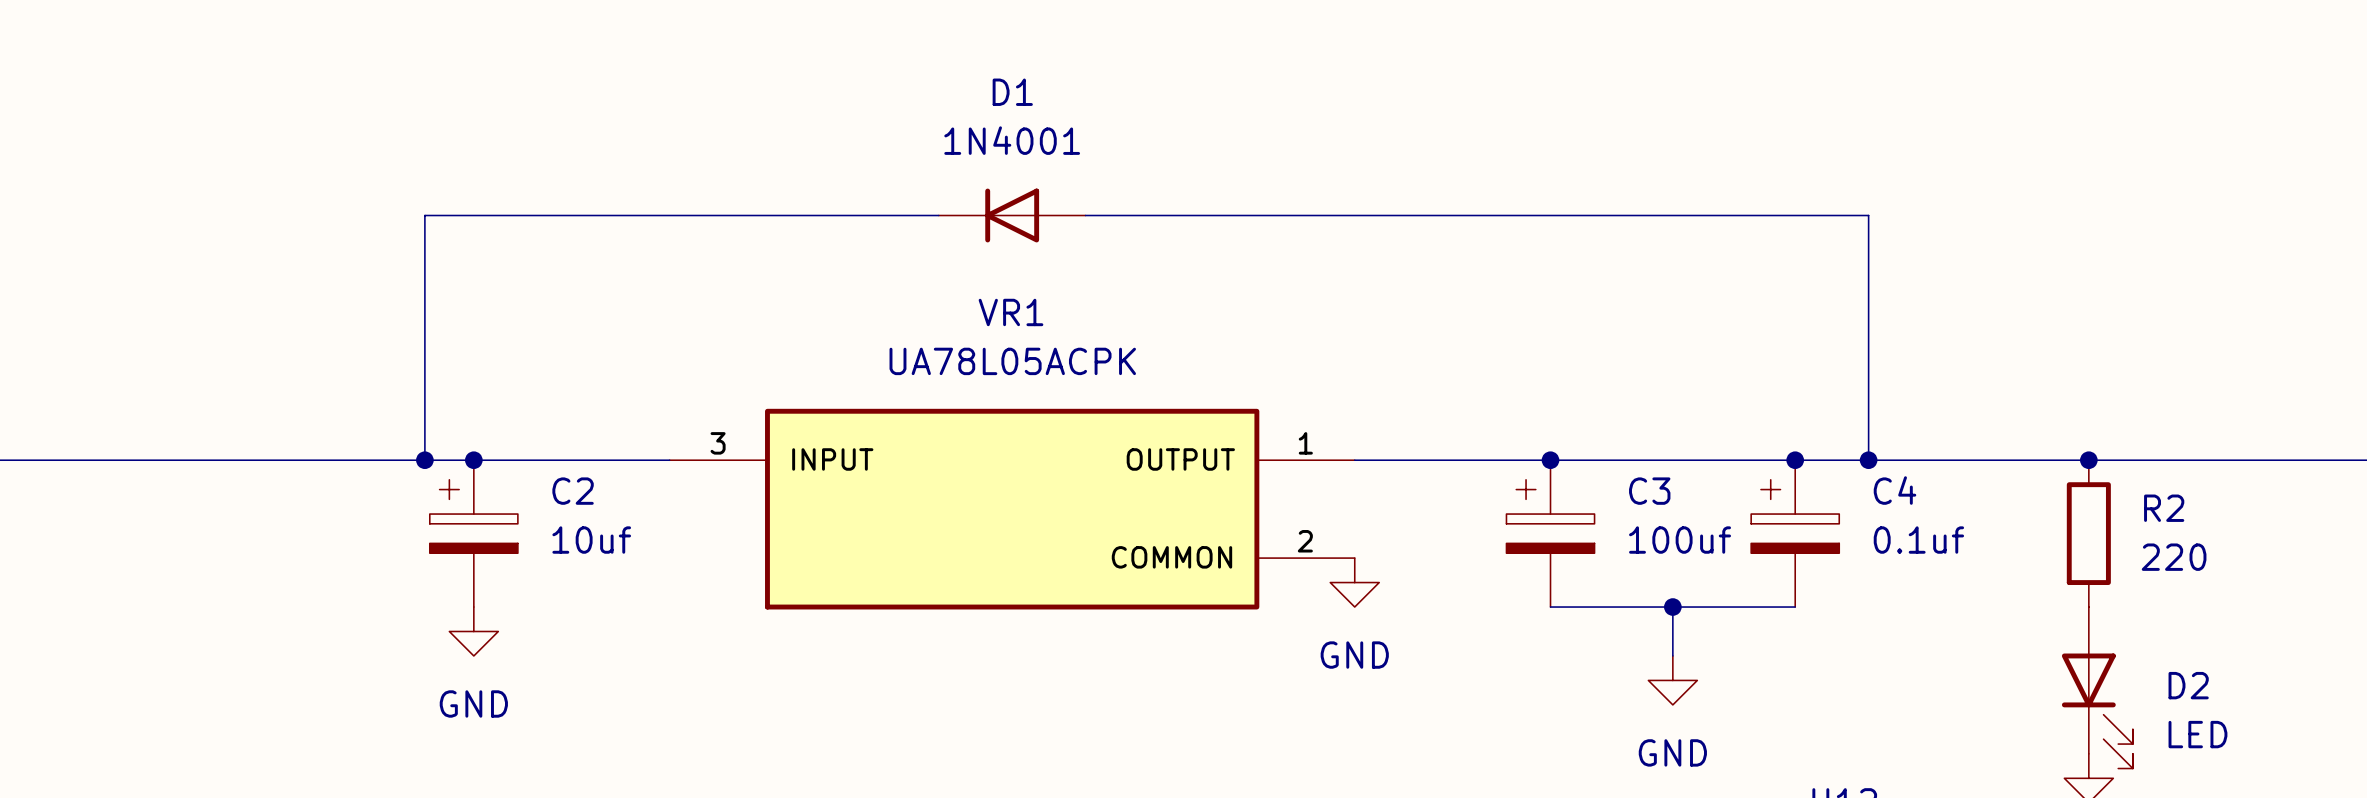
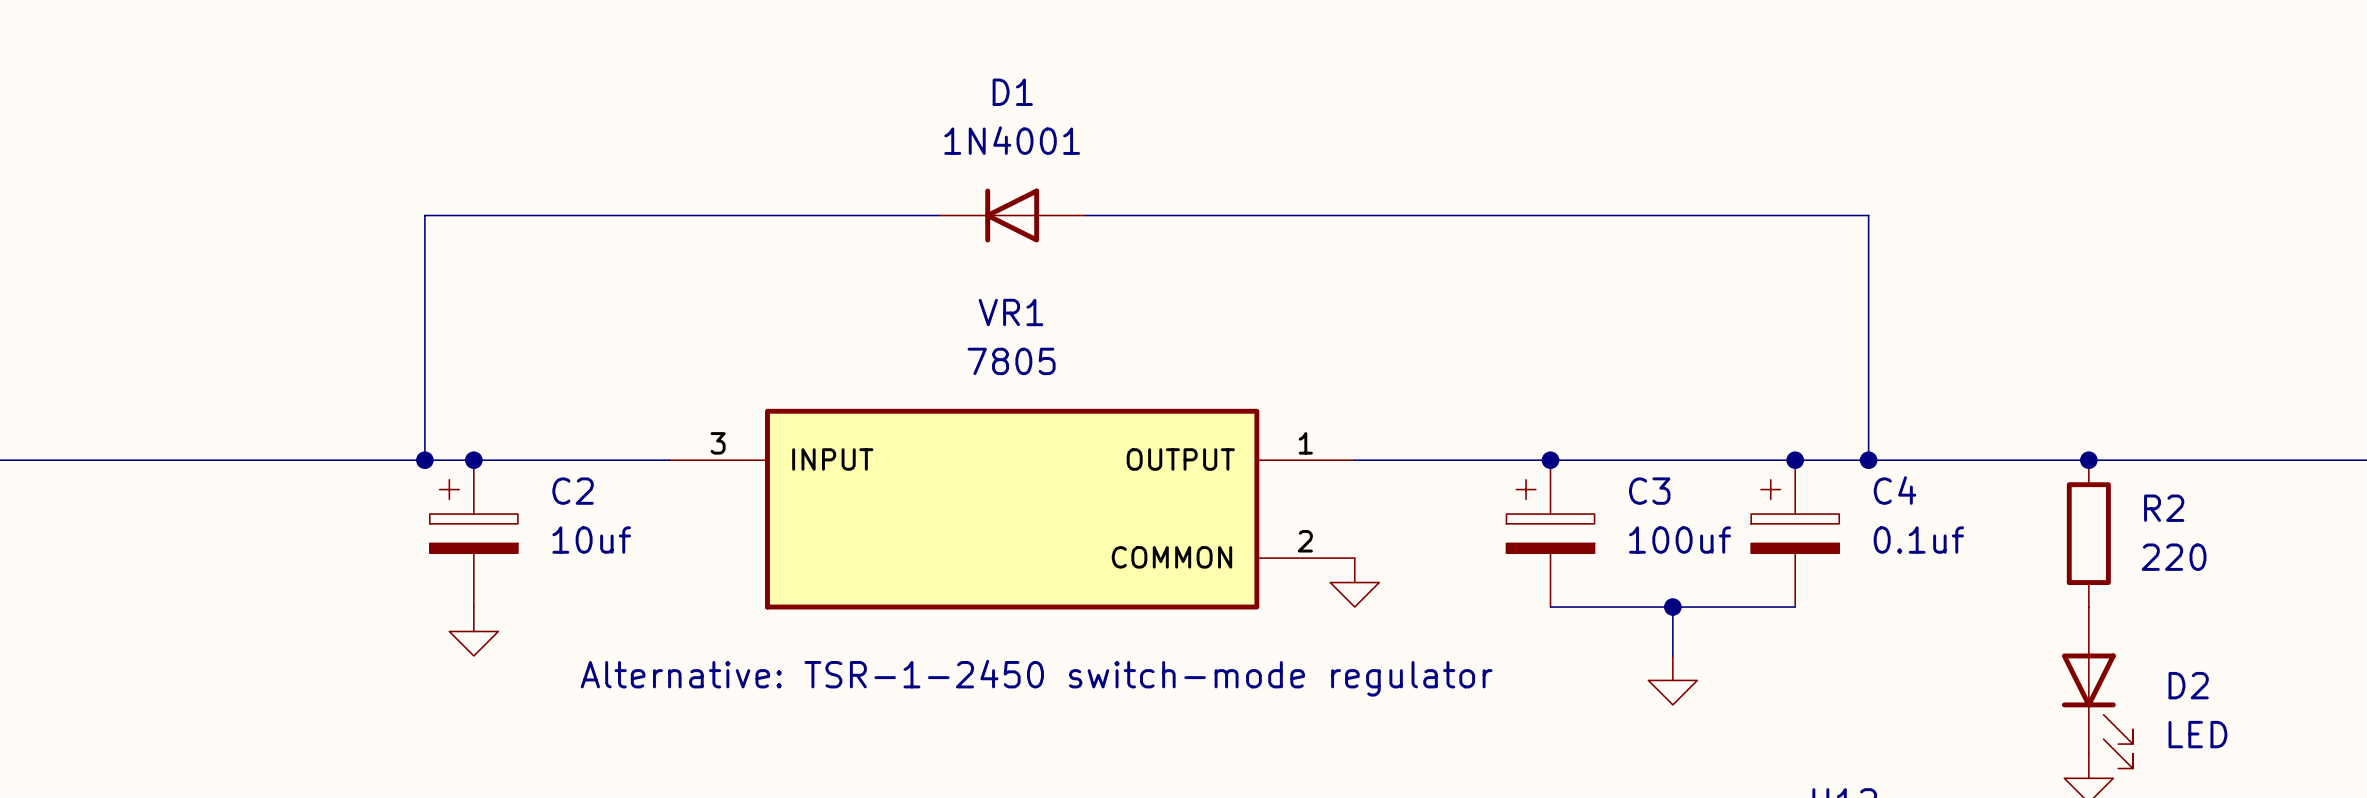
VR1 value: UA78L05ACPK (1012, 361) -> 7805 (1011, 361)
power symbol text: GND (1354, 655) -> none
text: none -> Alternative: TSR-1-2450 switch-mode regulator (1036, 678)
power symbol text: GND (473, 703) -> none
power symbol text: GND (1672, 752) -> none

